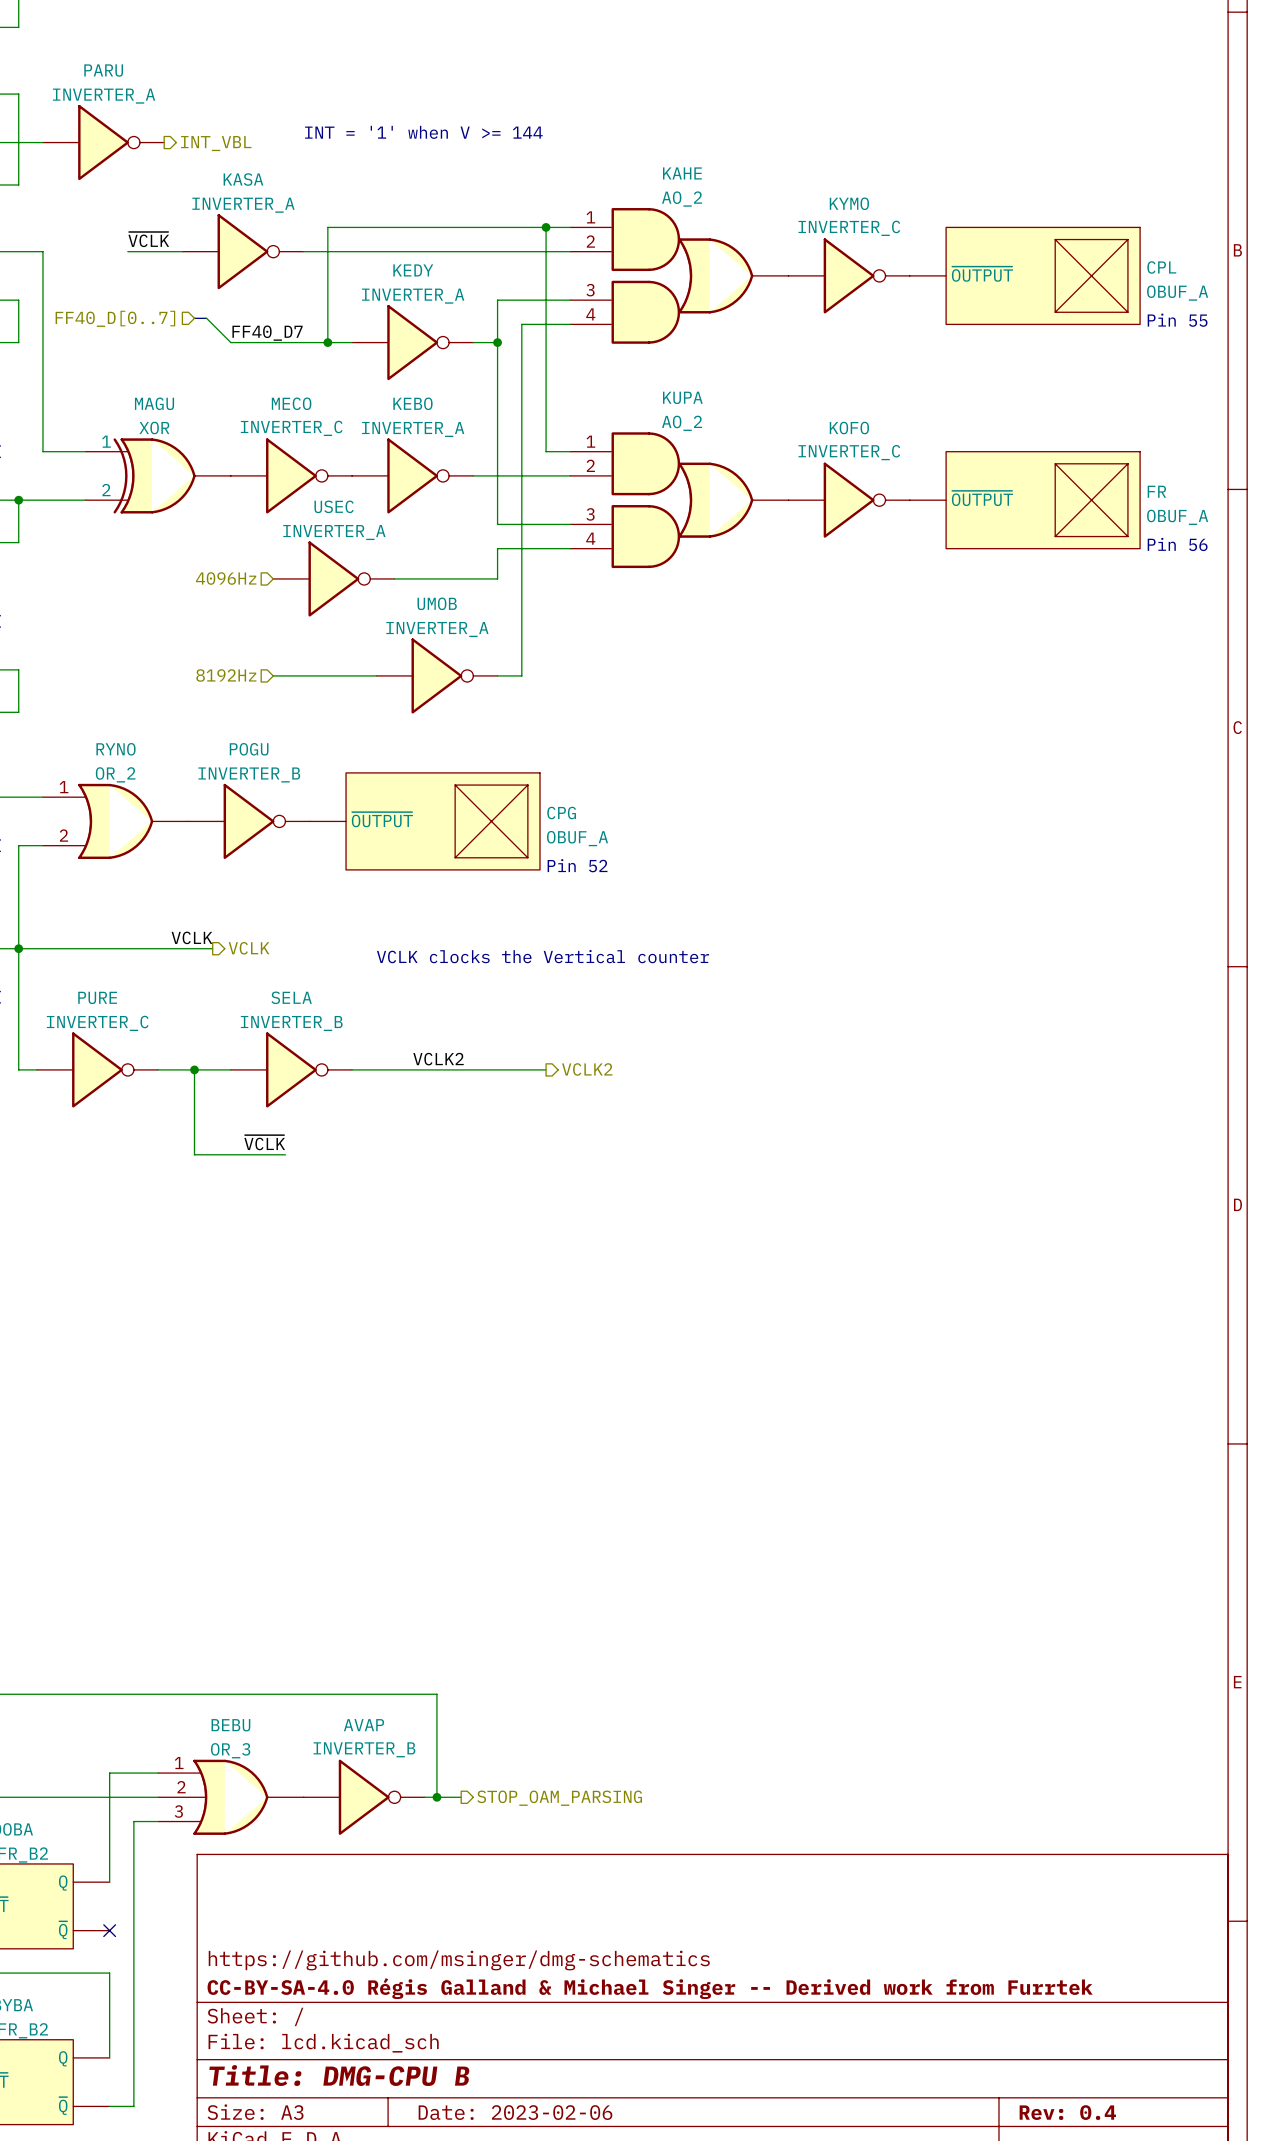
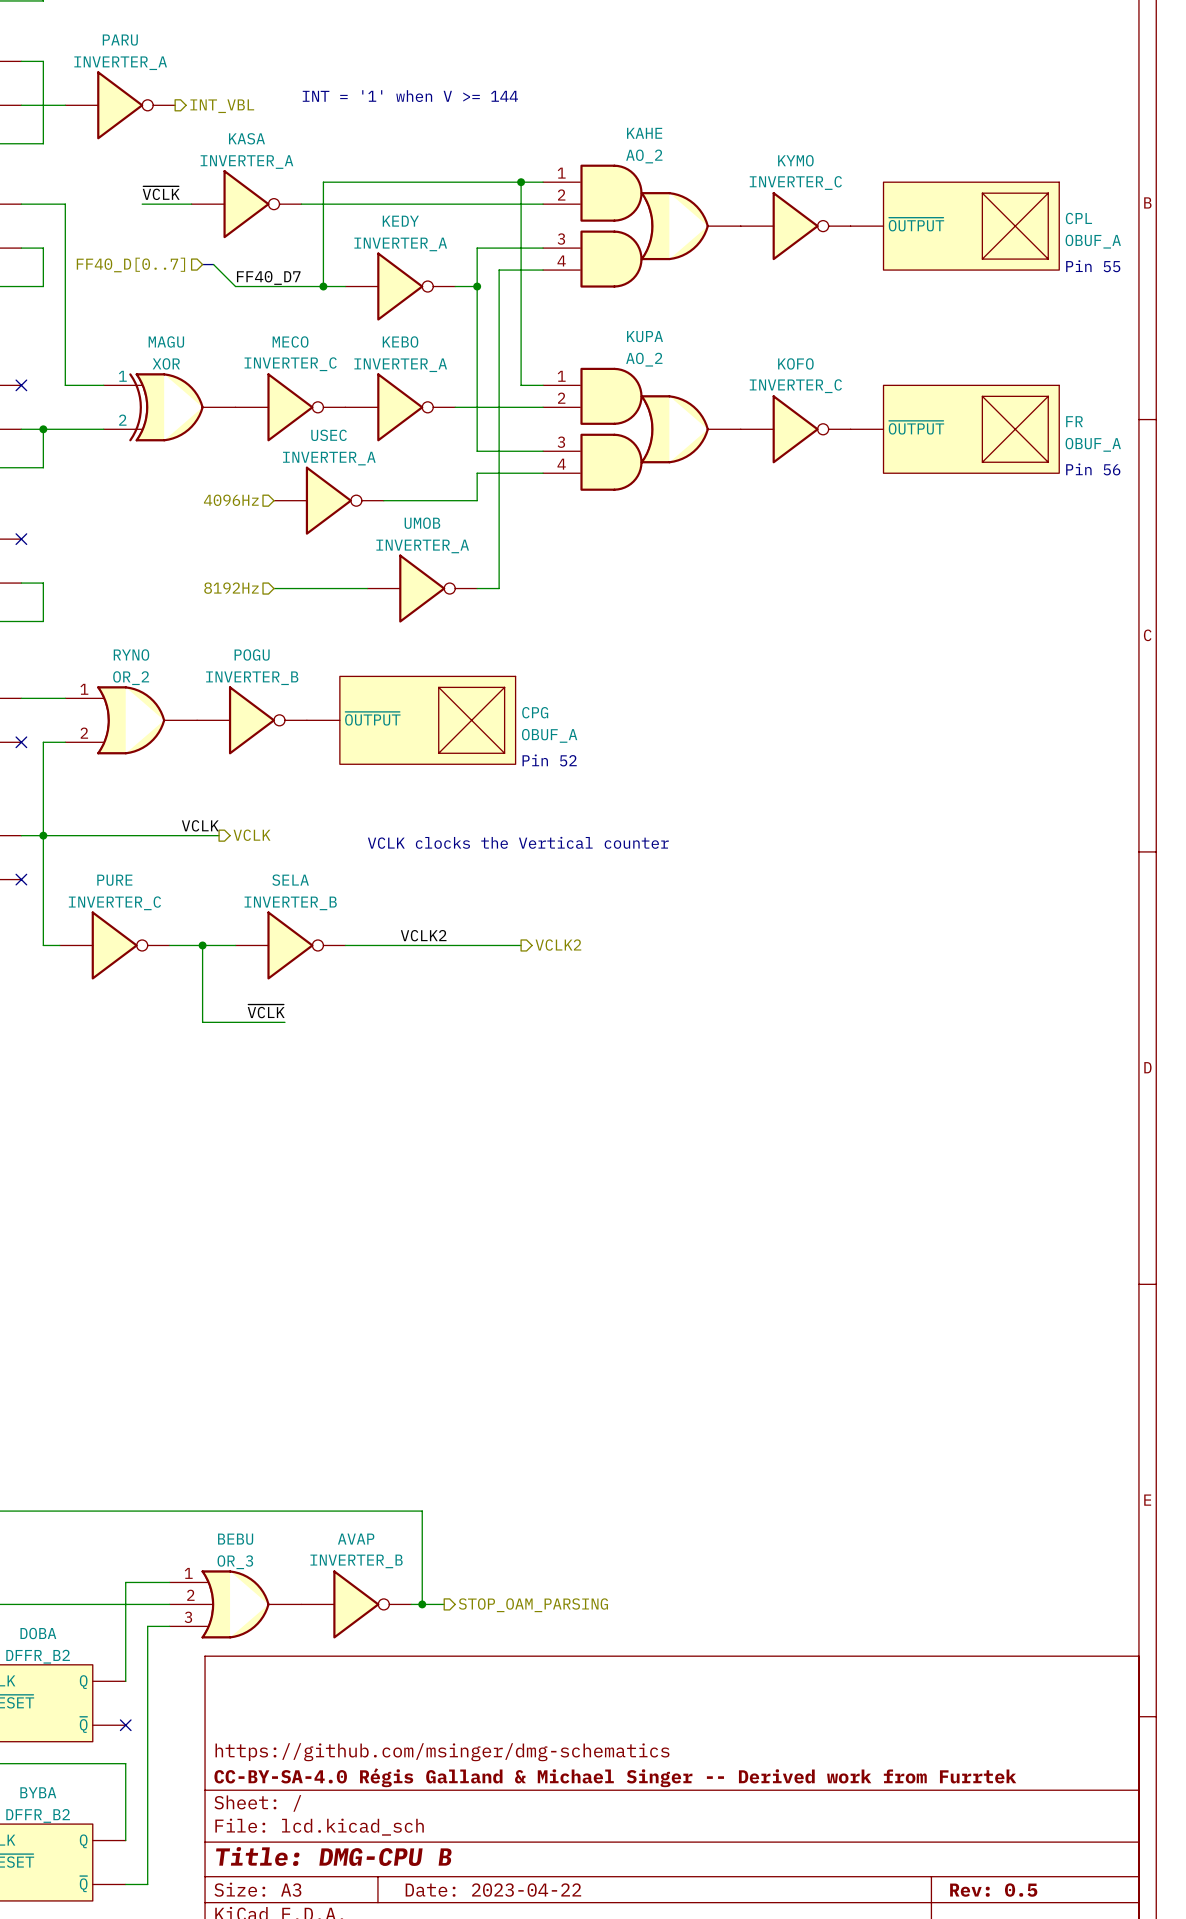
title block: Date: 2023-02-06 (515, 2112) -> Date: 2023-04-22 (493, 1890)
title block: Rev: 0.4 (1067, 2112) -> Rev: 0.5 (993, 1890)

